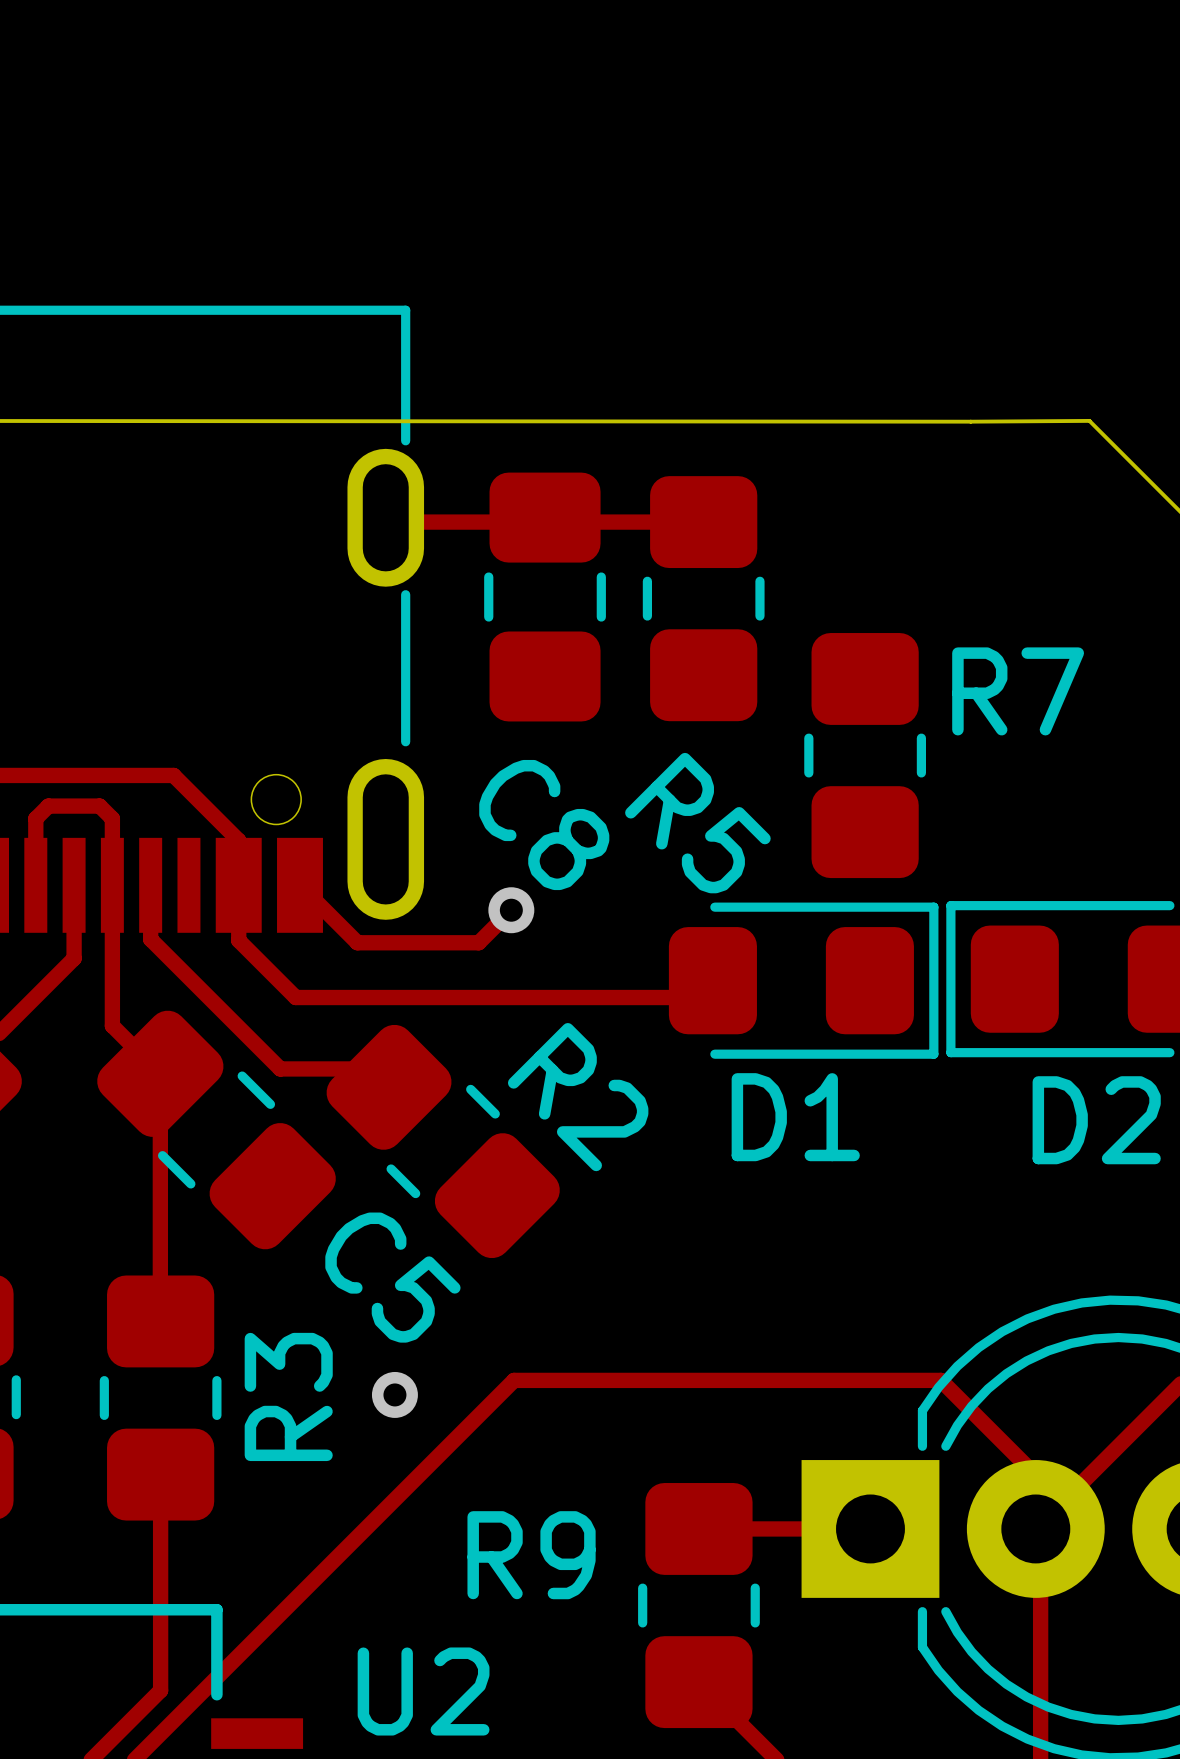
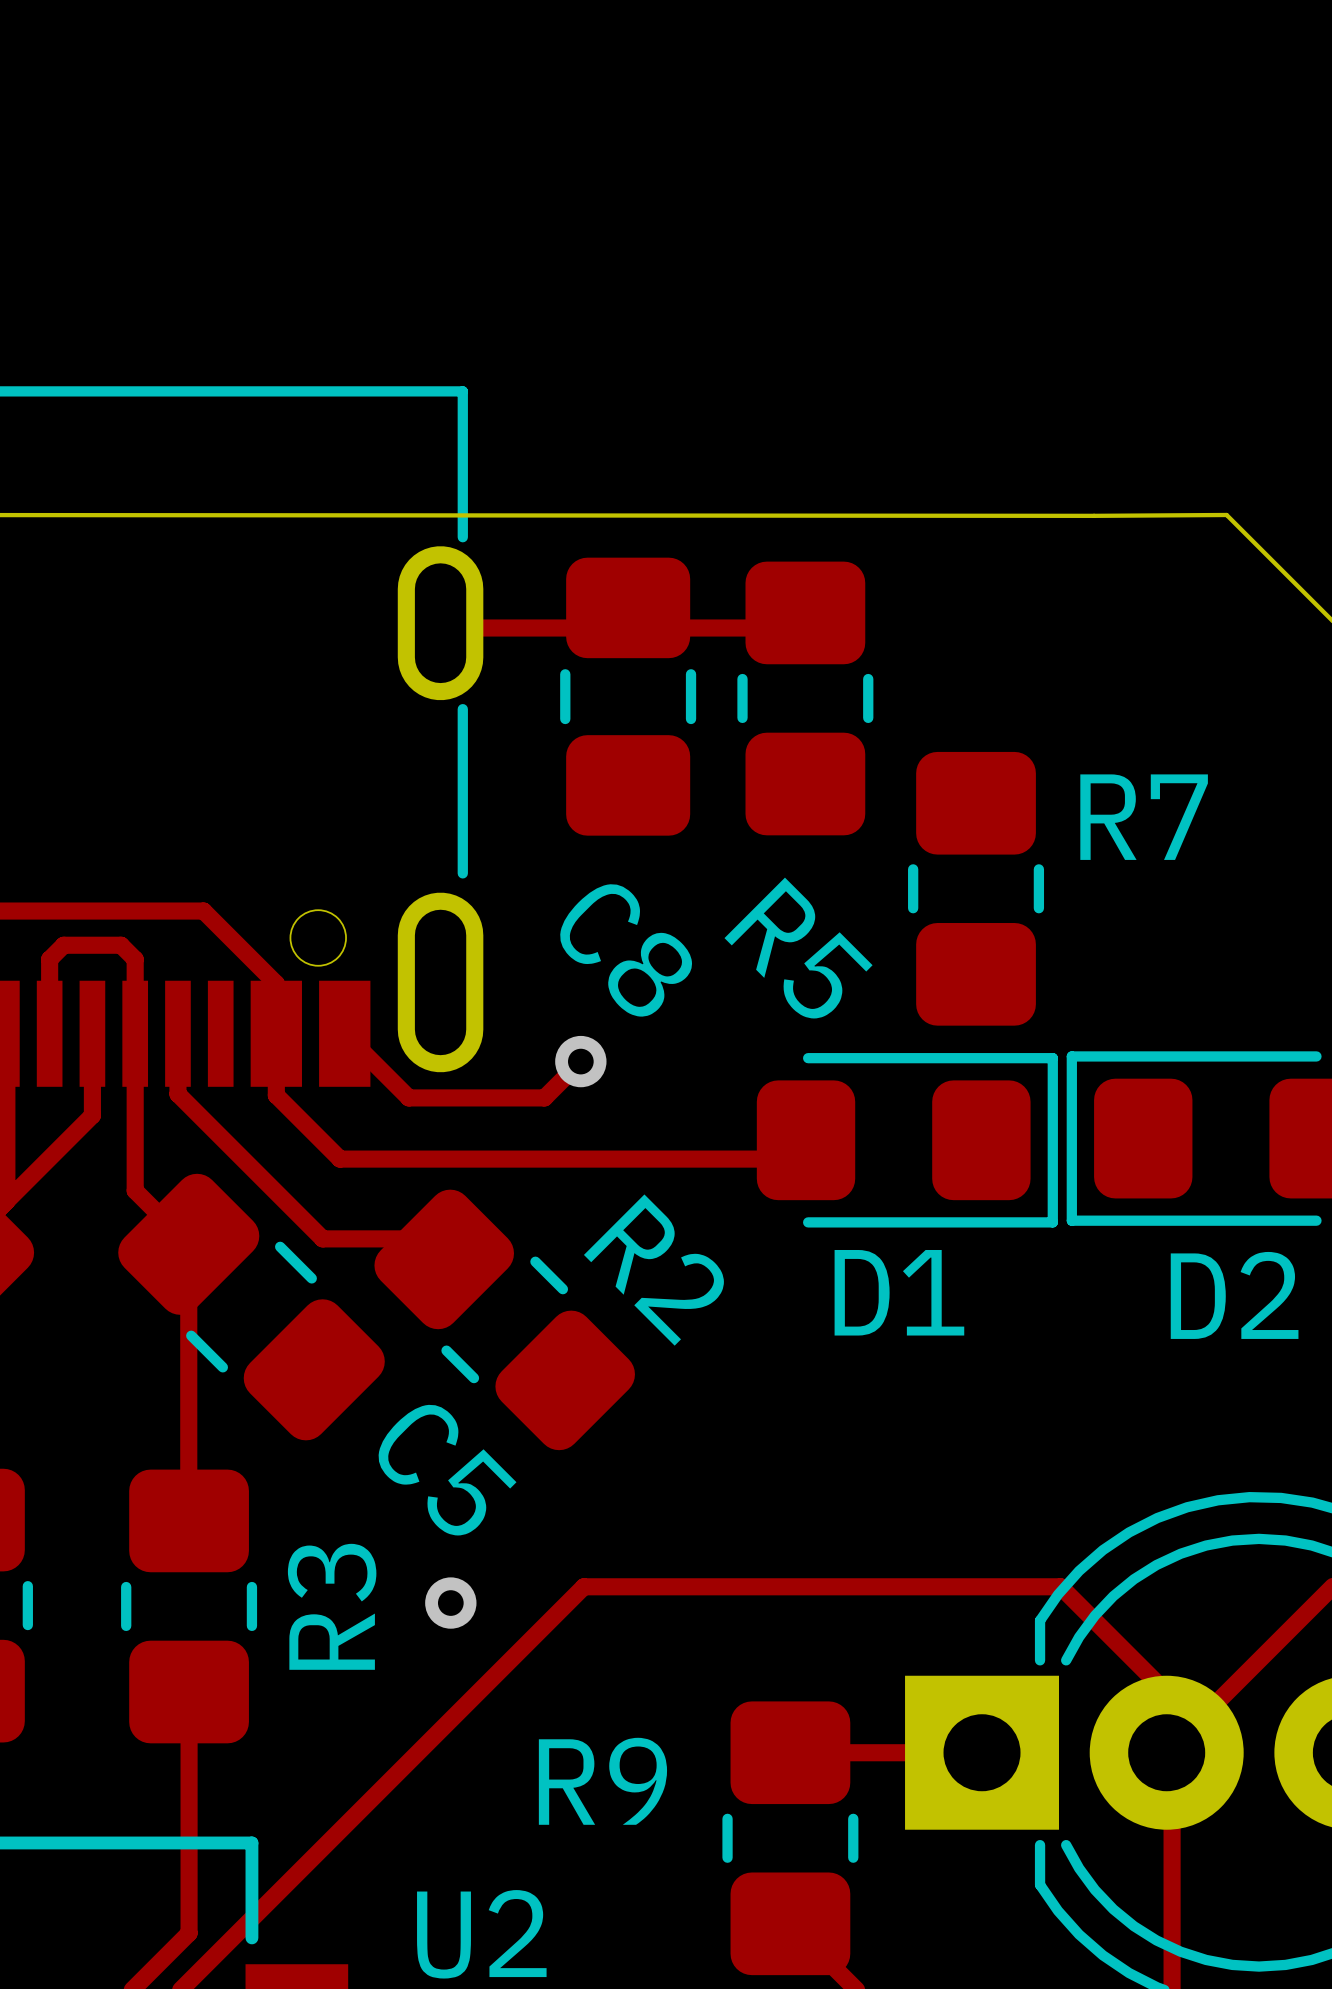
C8 position: (545, 597) -> (628, 696)
R5 position: (703, 598) -> (805, 698)

